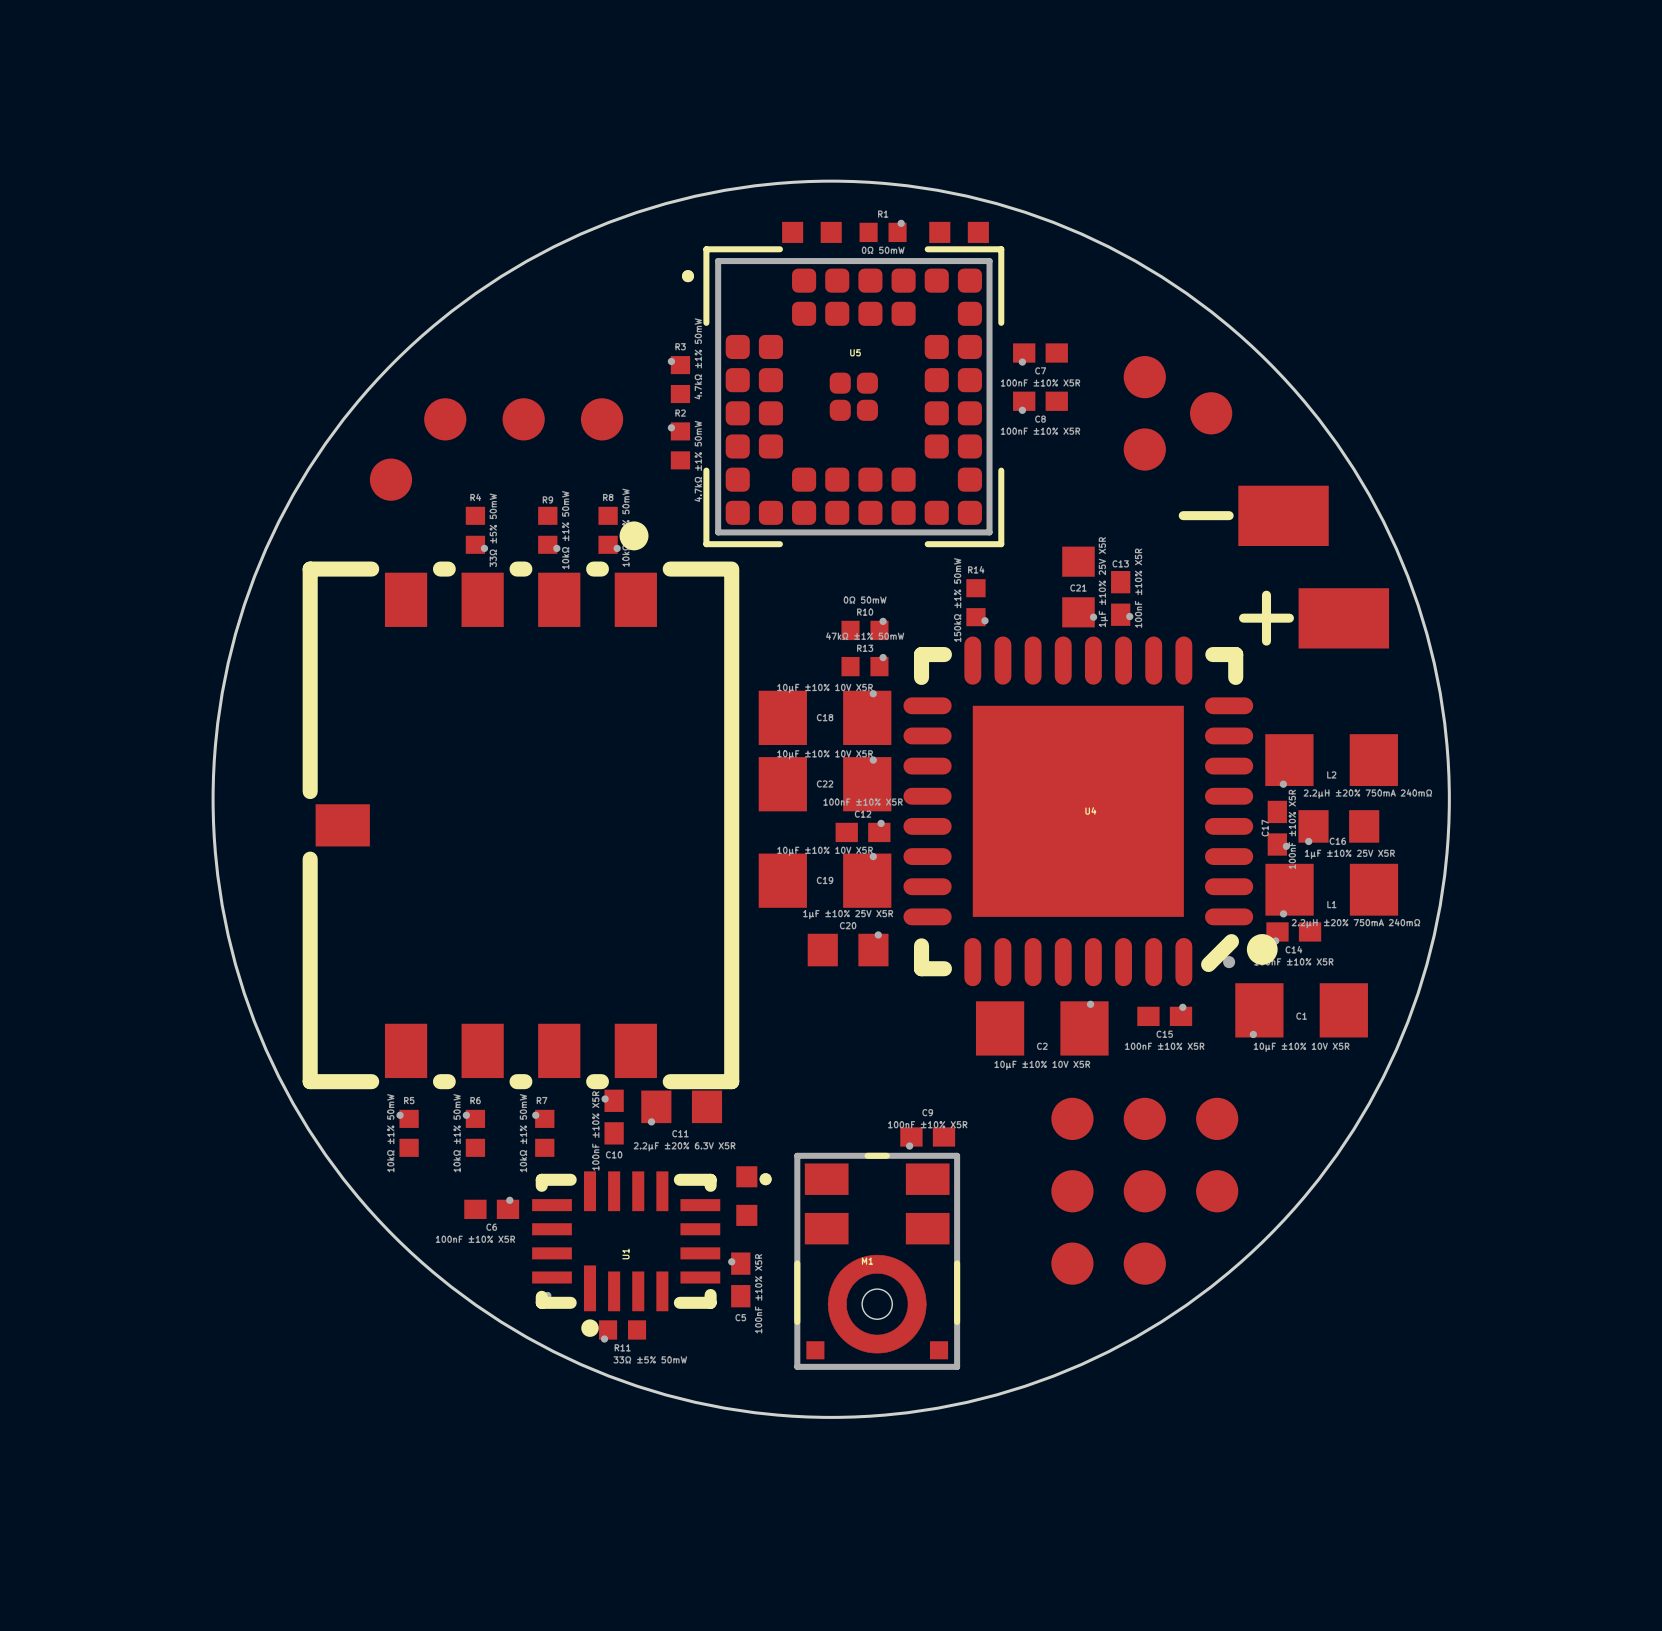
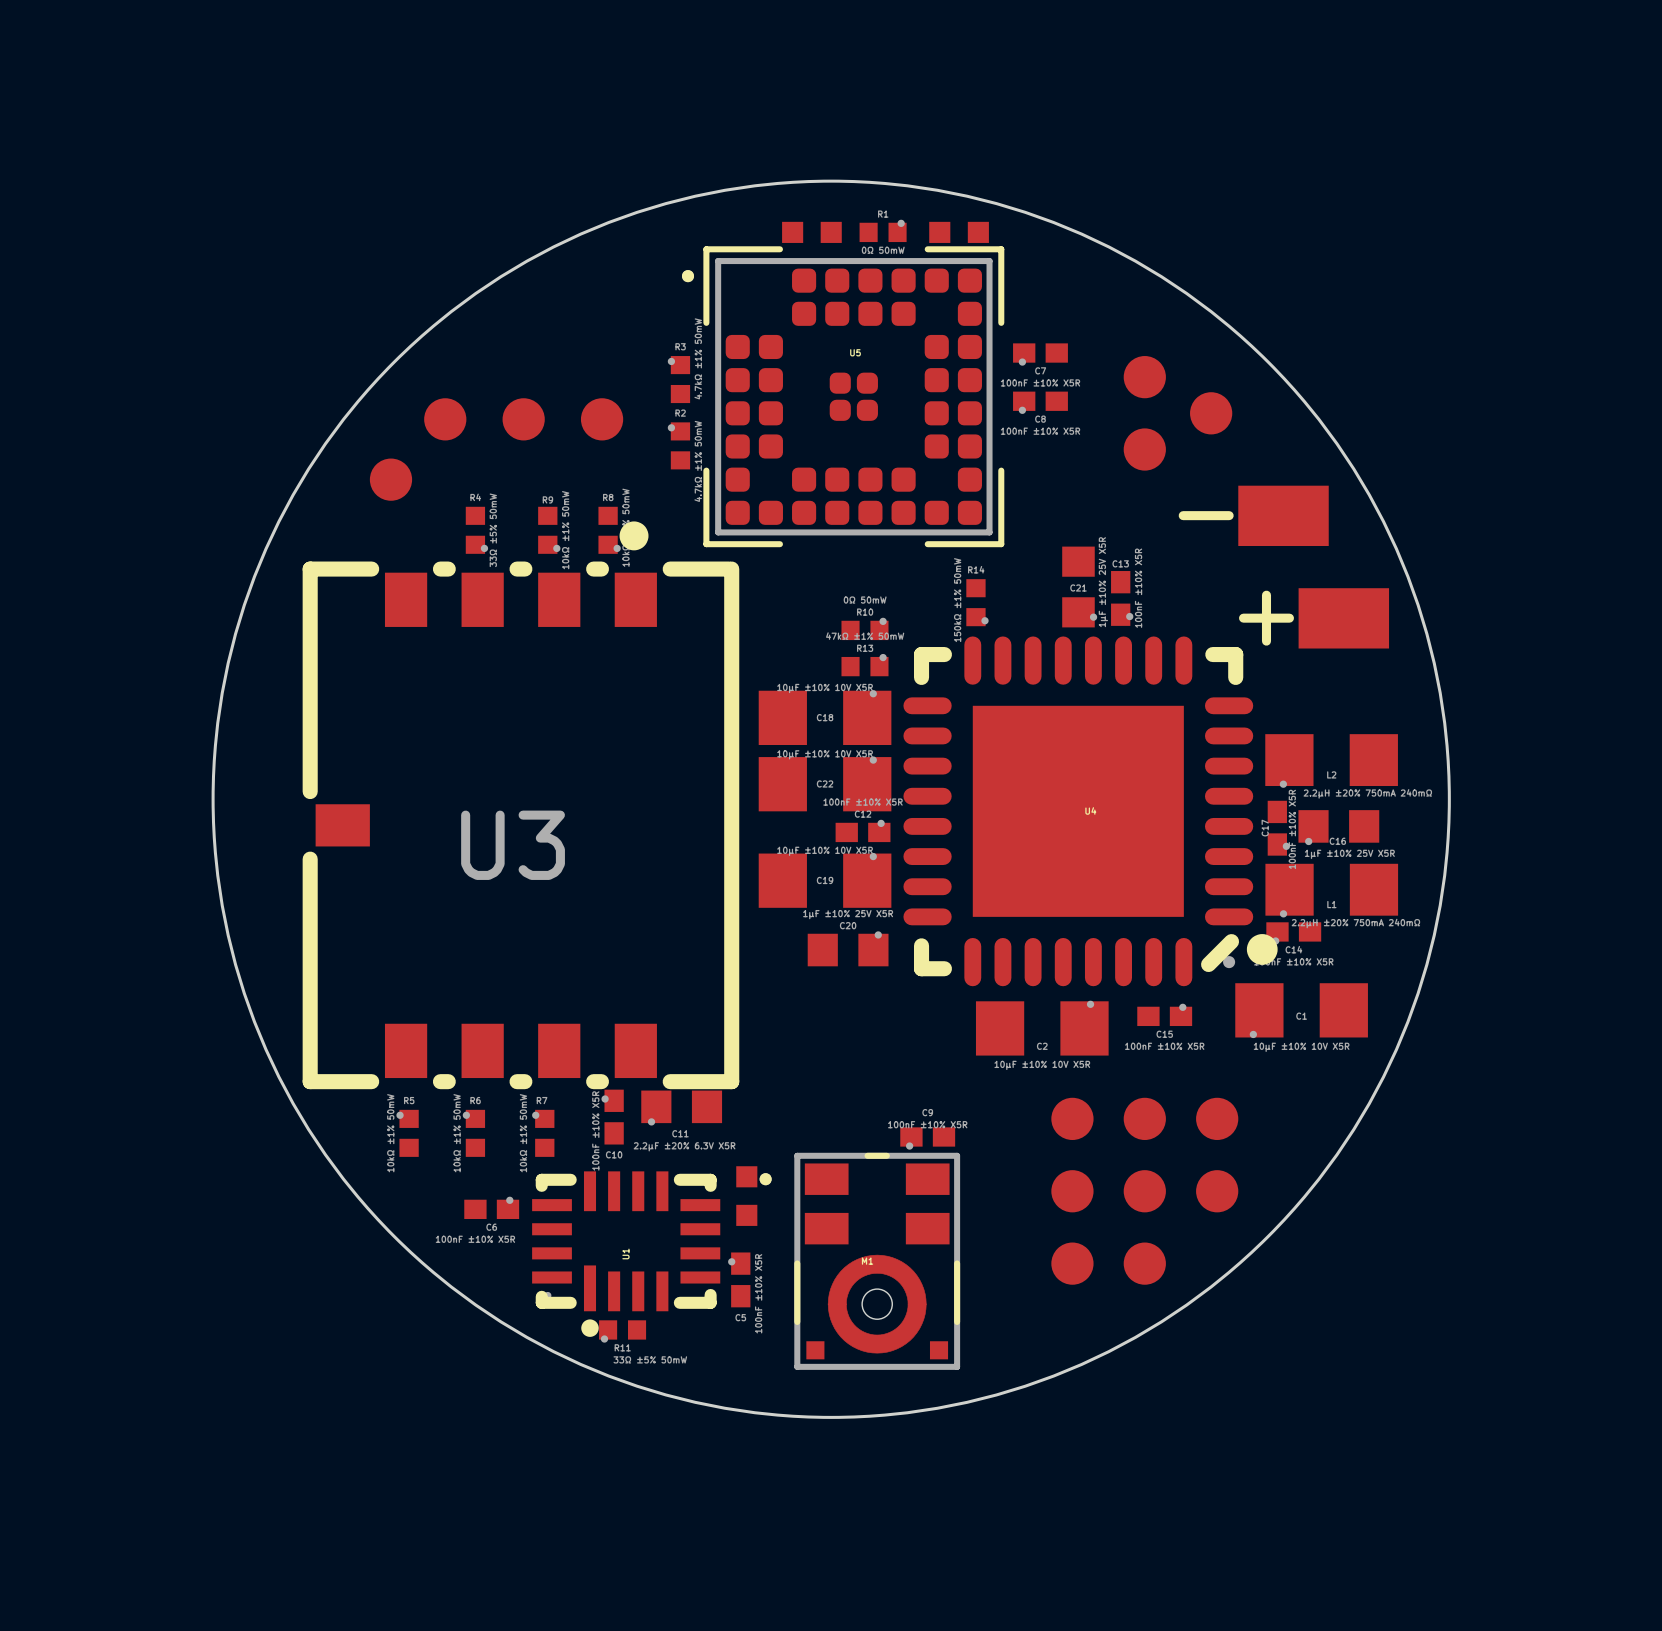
U3 name: none -> U3 (513, 845)

